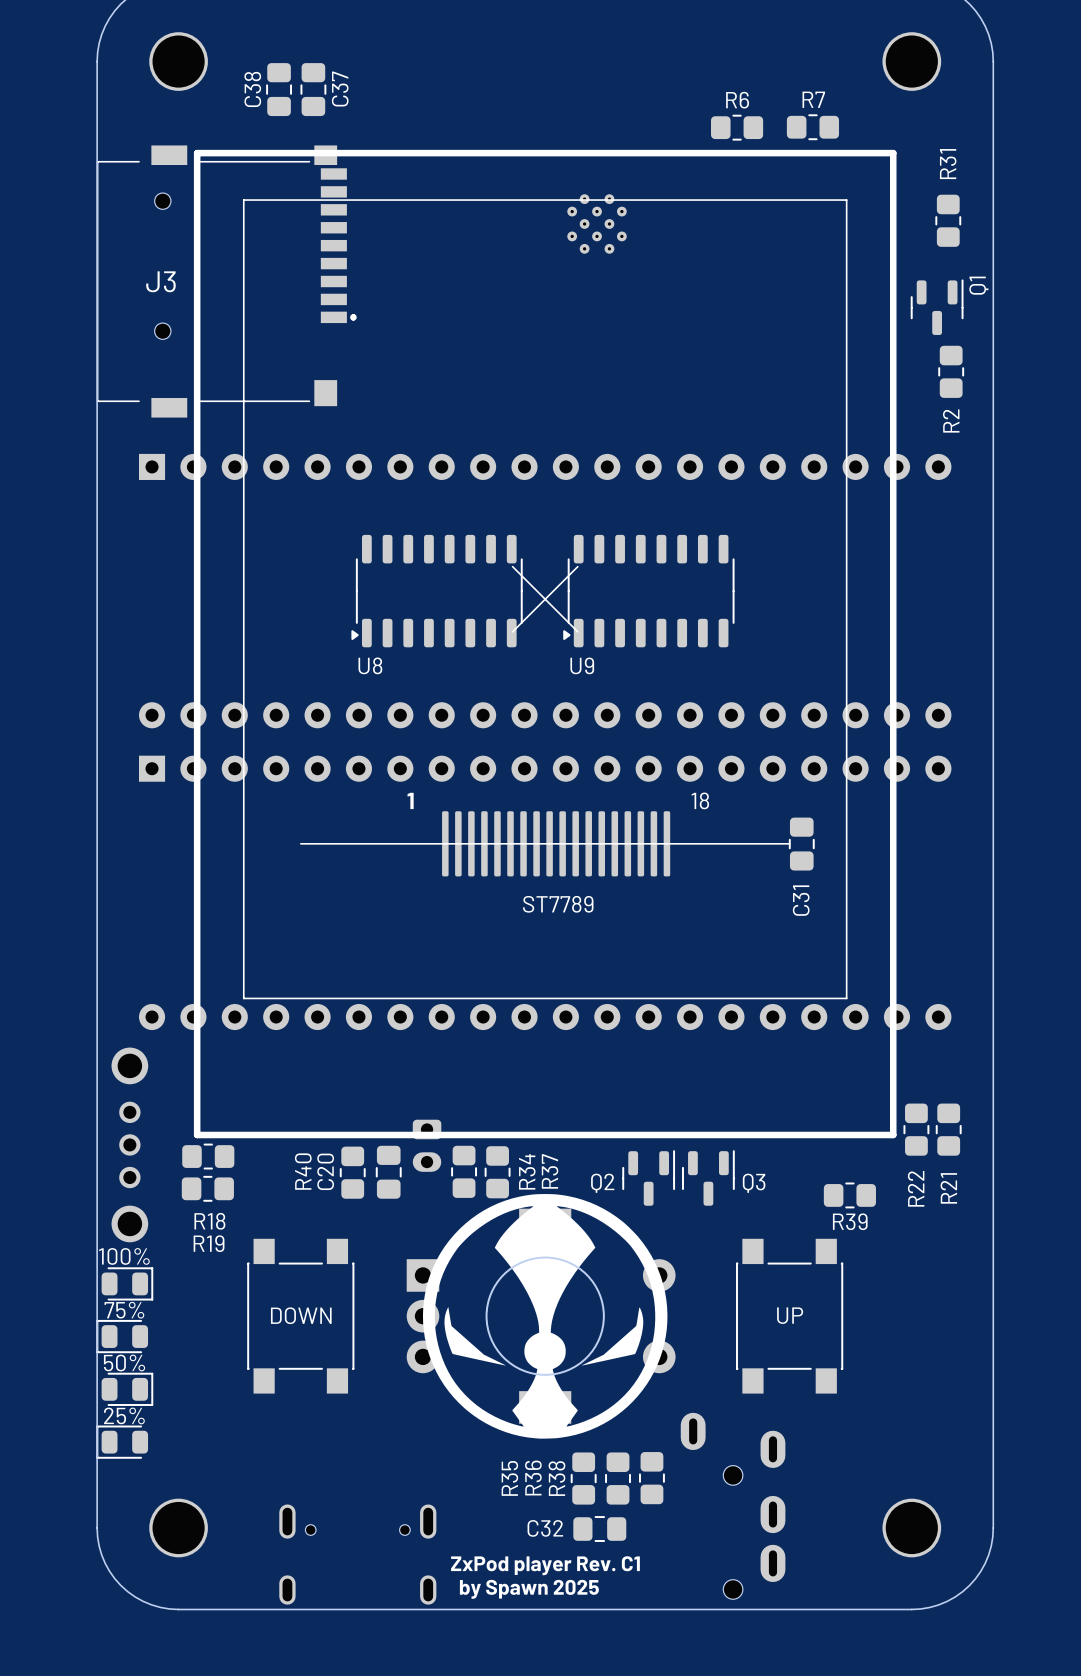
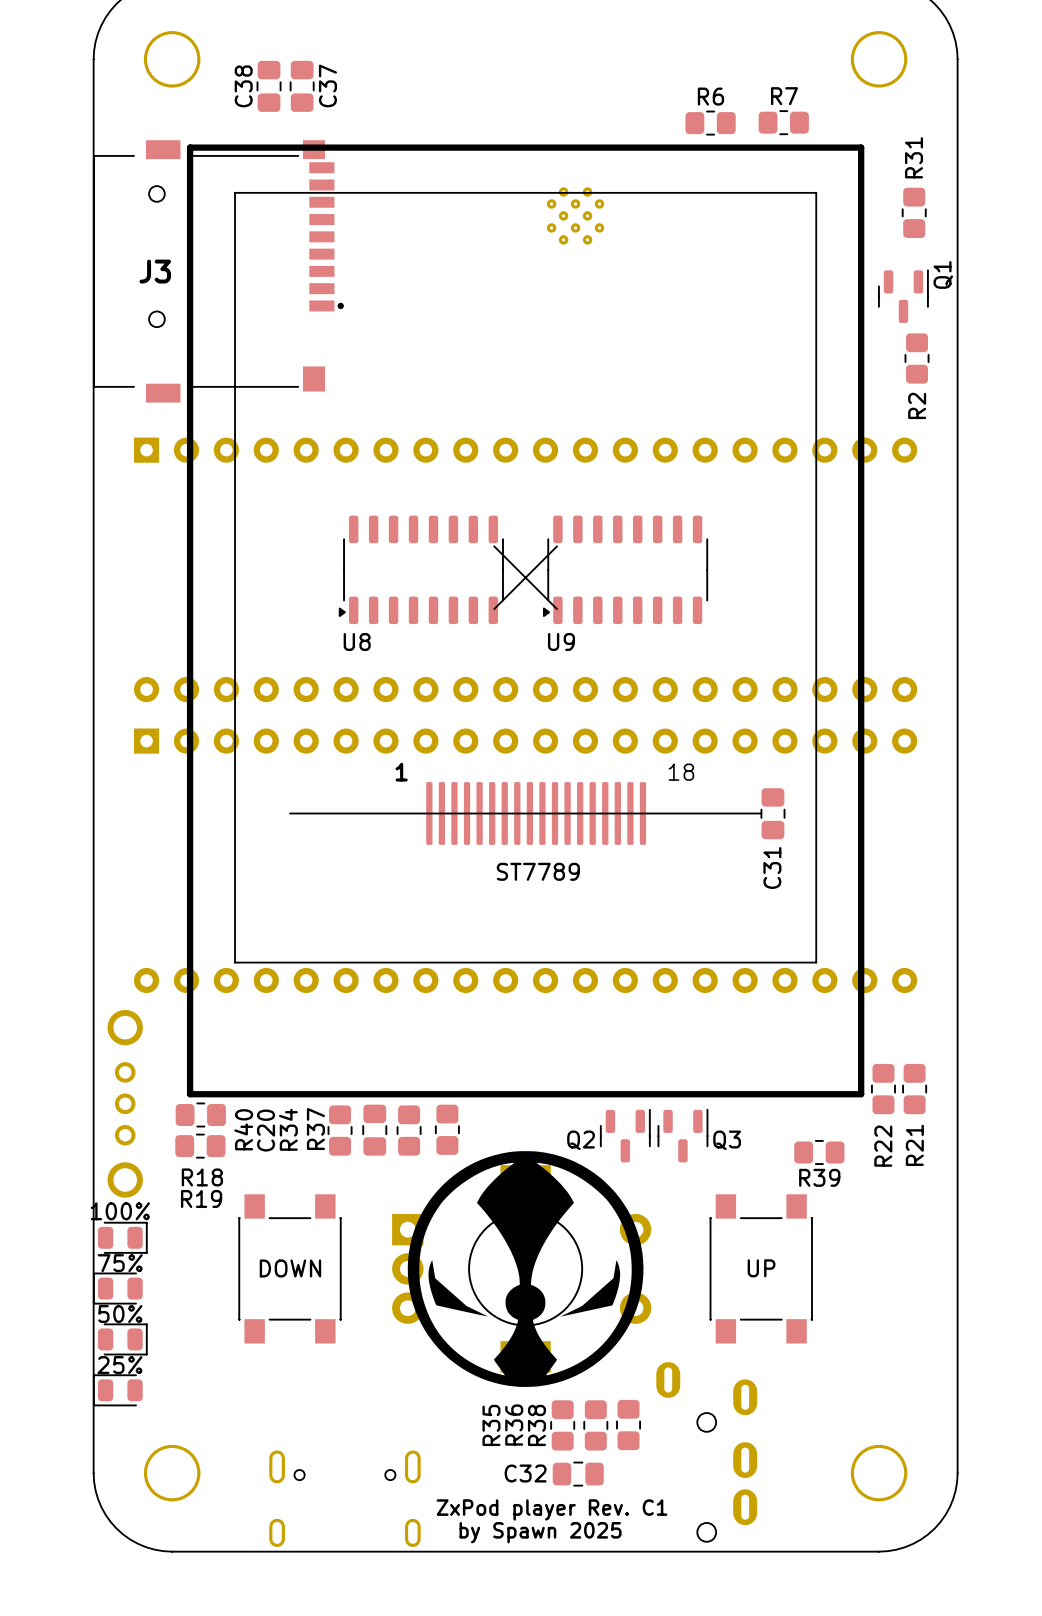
part: (427, 1145) -> none
R40 name position: R40 (303, 1171) -> R40 (243, 1129)
C20 name position: C20 (325, 1171) -> C20 (266, 1130)
R34 name: R34 (527, 1171) -> R37 (315, 1129)
R34: none -> (409, 1130)
R37: (497, 1172) -> none

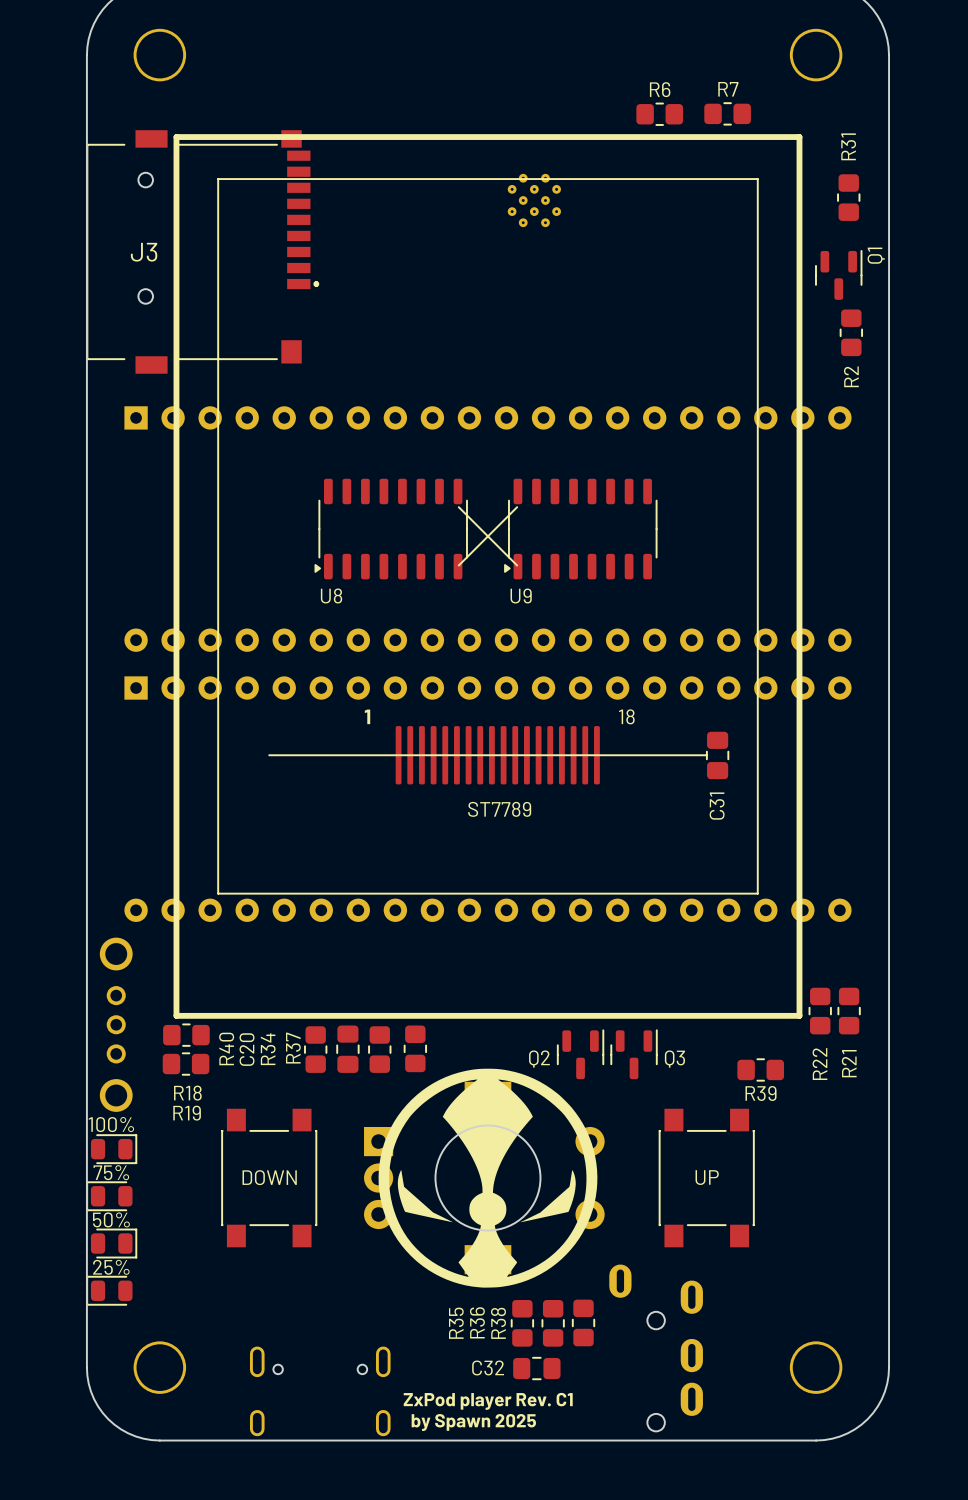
C38: (269, 86) -> none
C37: (302, 86) -> none

